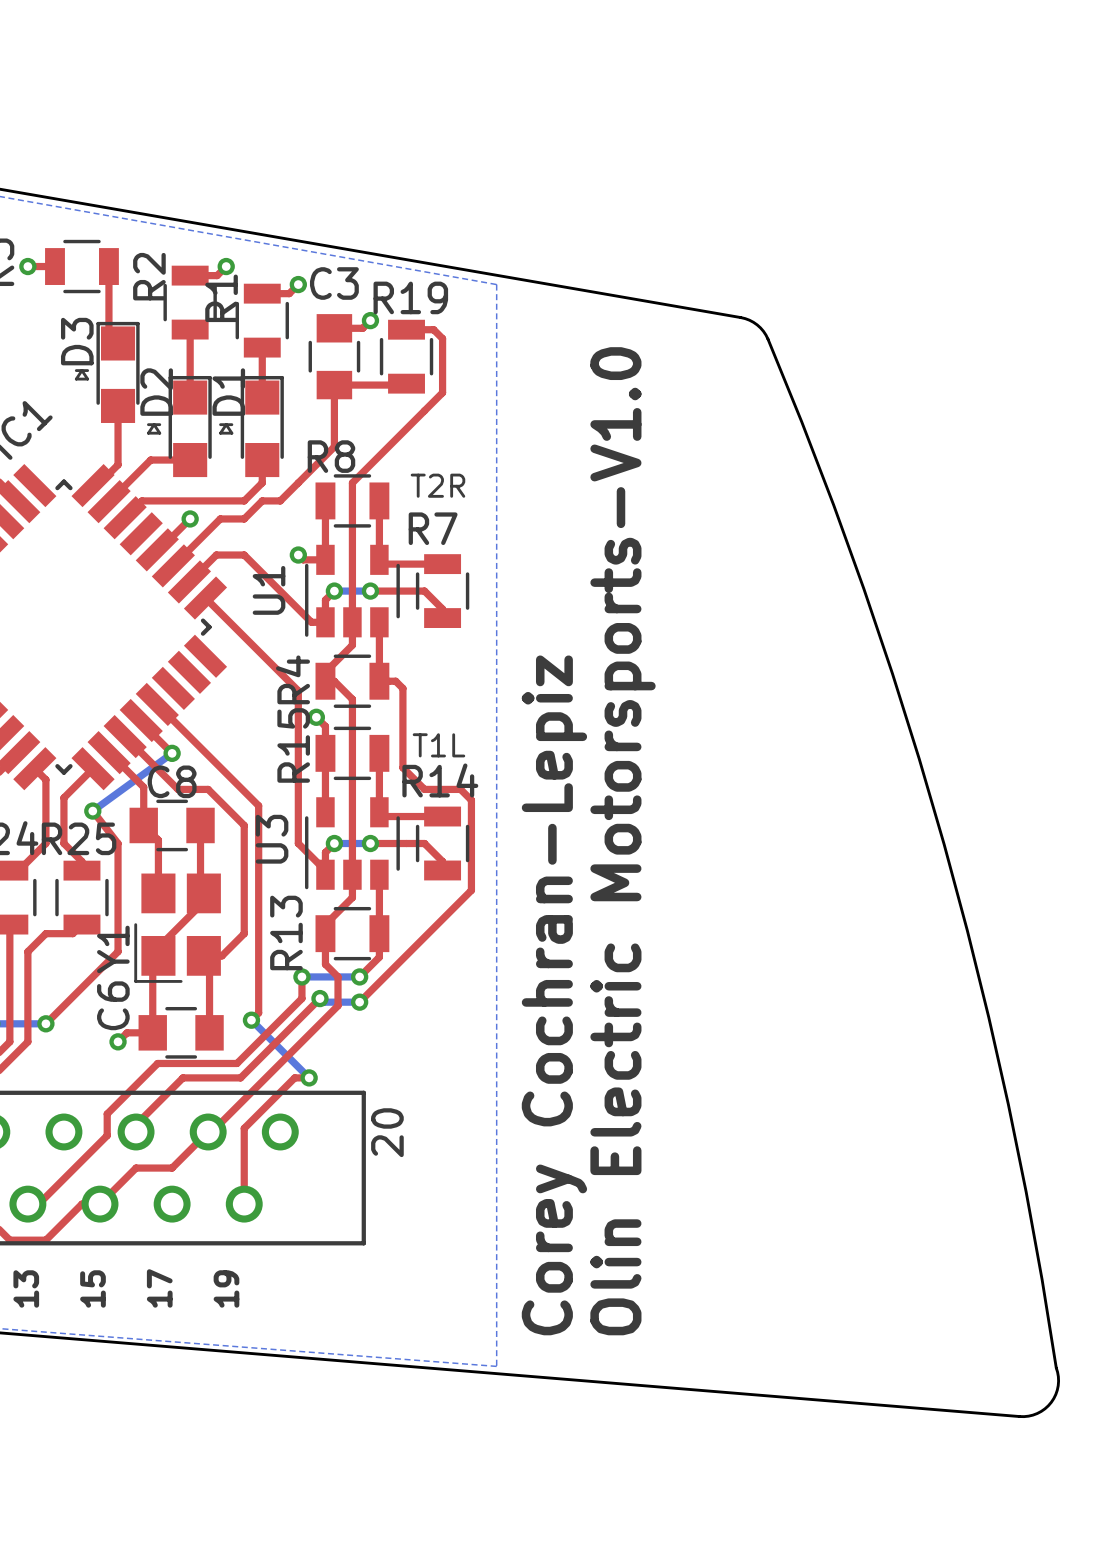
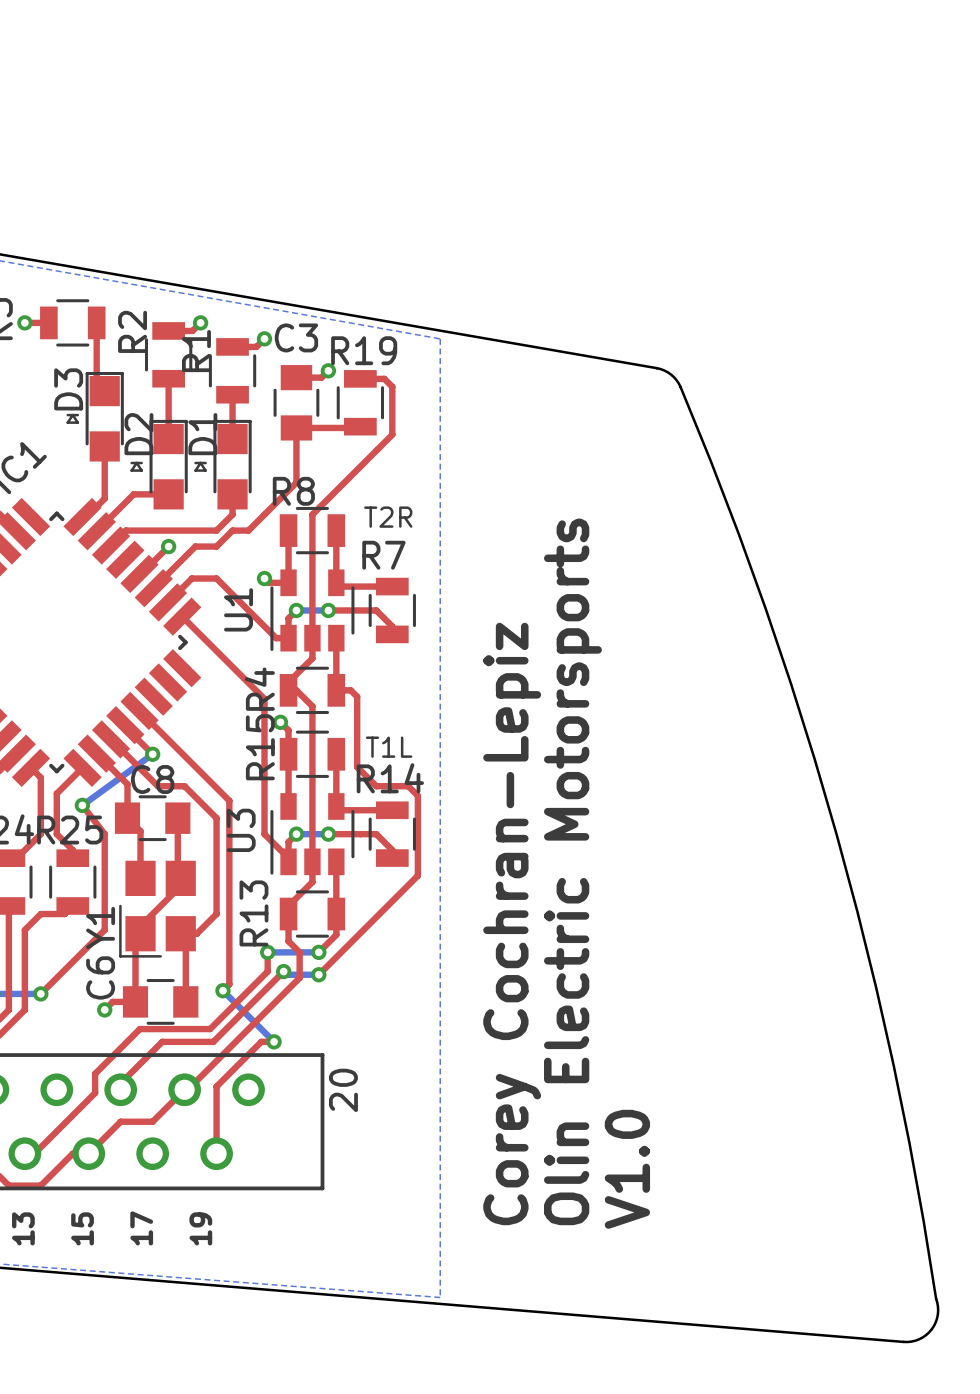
text: Olin Electric Motorsports-V1.0 (623, 841) -> Olin Electric Motorsports (572, 871)
text position: Corey Cochran-Lepiz (554, 995) -> Corey Cochran-Lepiz (512, 923)
text: none -> V1.0 (627, 1169)

